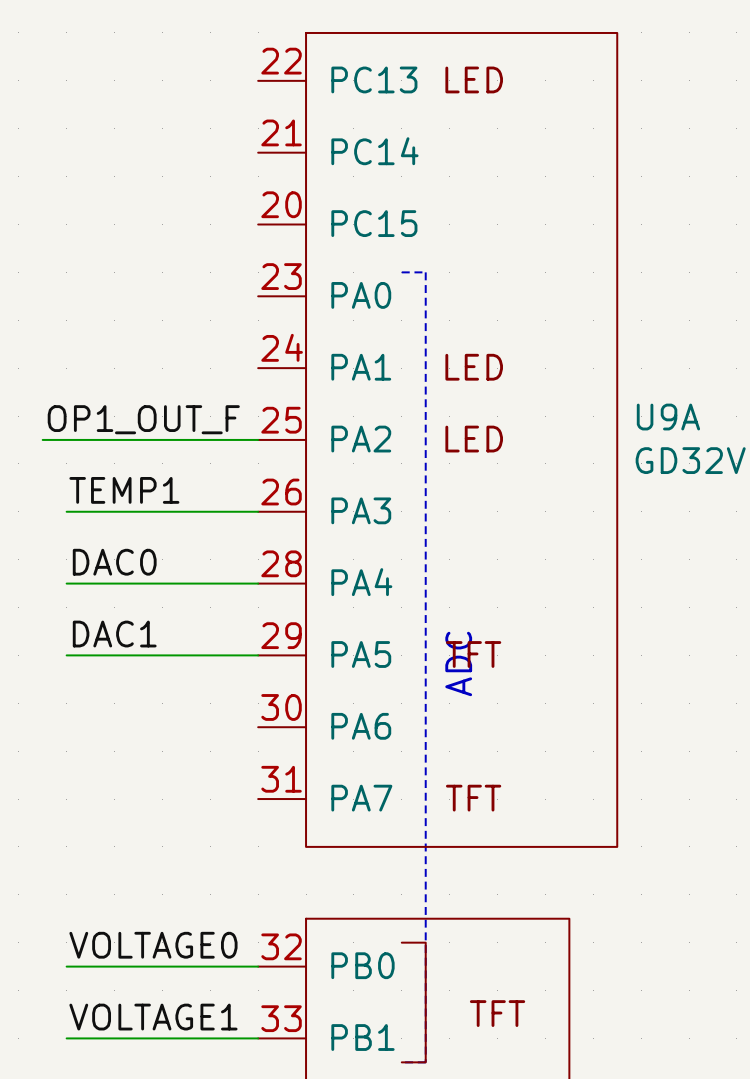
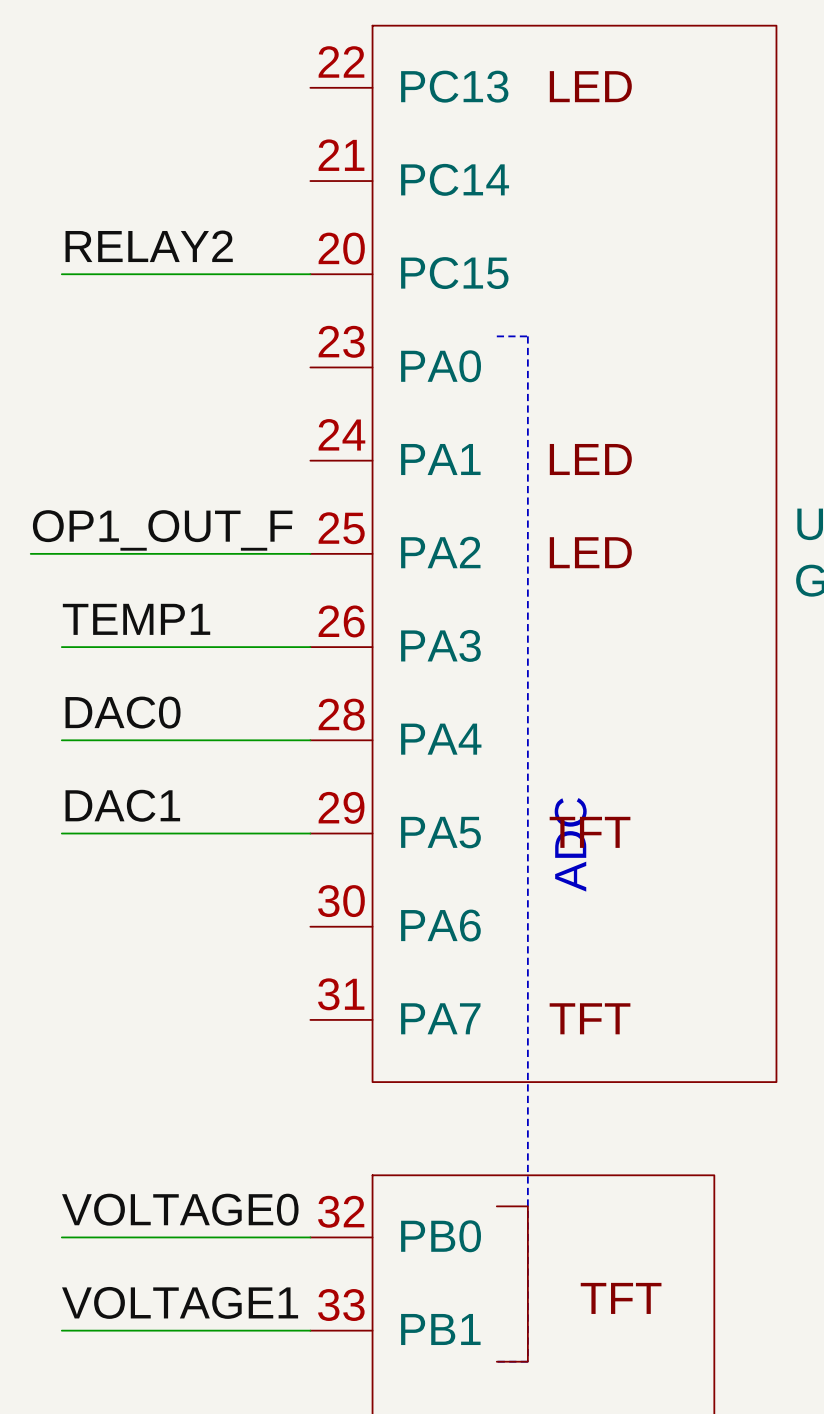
label: none -> RELAY2 (149, 246)
wire: none -> (61, 274) (310, 274)

